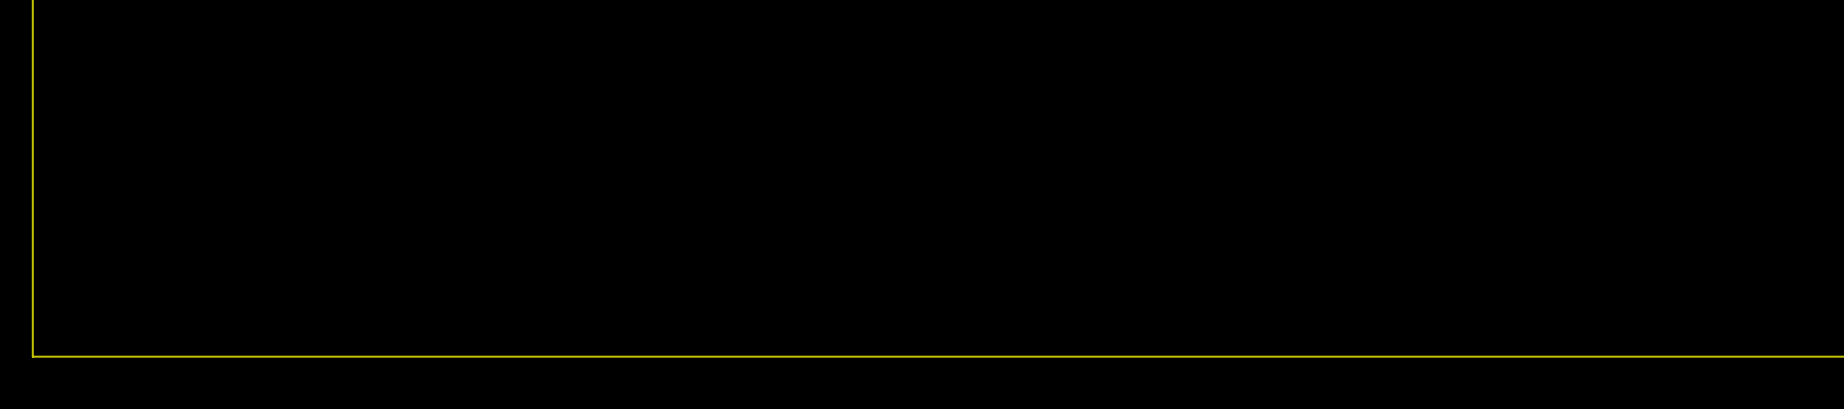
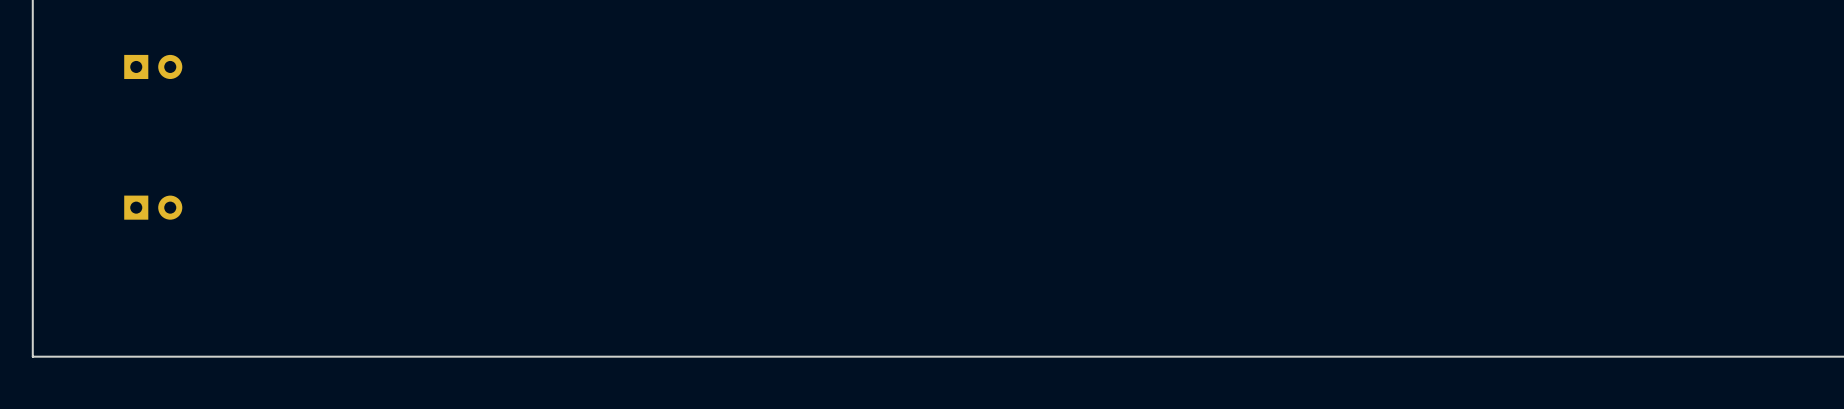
part: none -> (153, 66)
part: none -> (153, 207)

